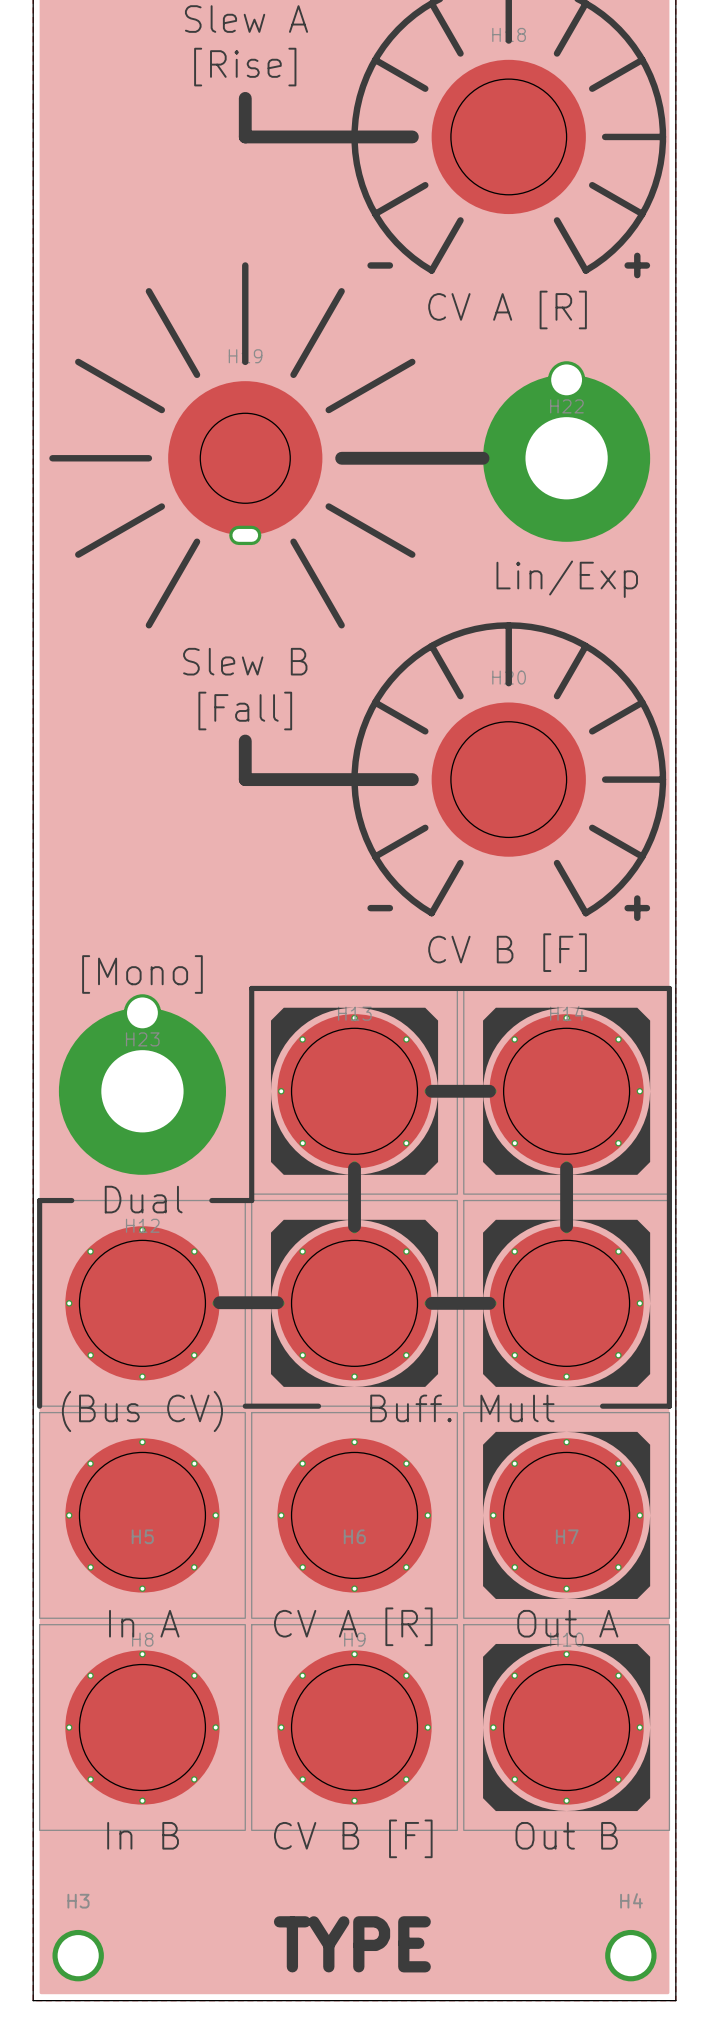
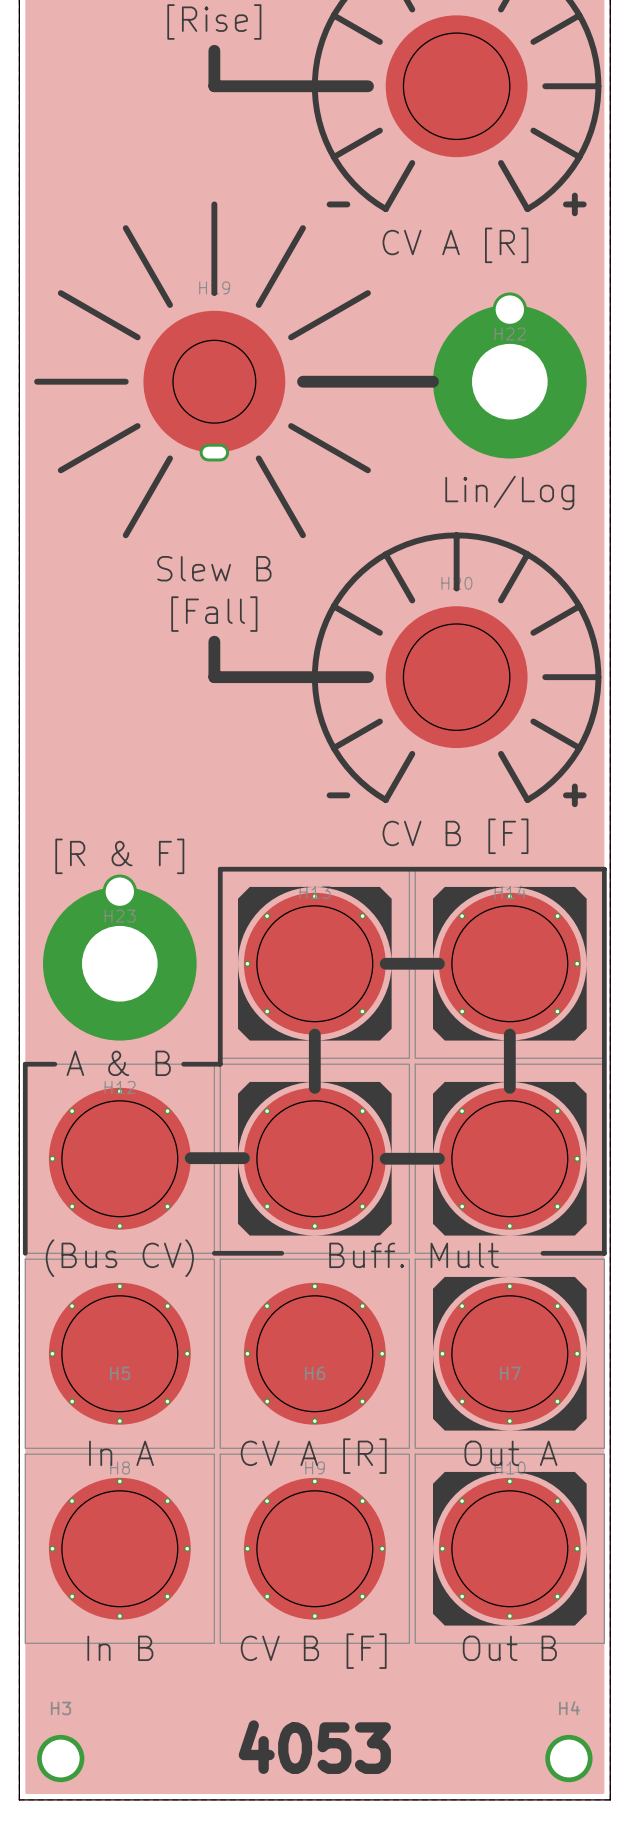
part value: Lin/Exp (567, 579) -> Lin/Log (509, 492)
text: [Mono] (142, 974) -> [R & F] (119, 856)
part value: Dual (143, 1199) -> A & B (118, 1063)
text: TYPE (352, 1944) -> 4053 (314, 1747)

